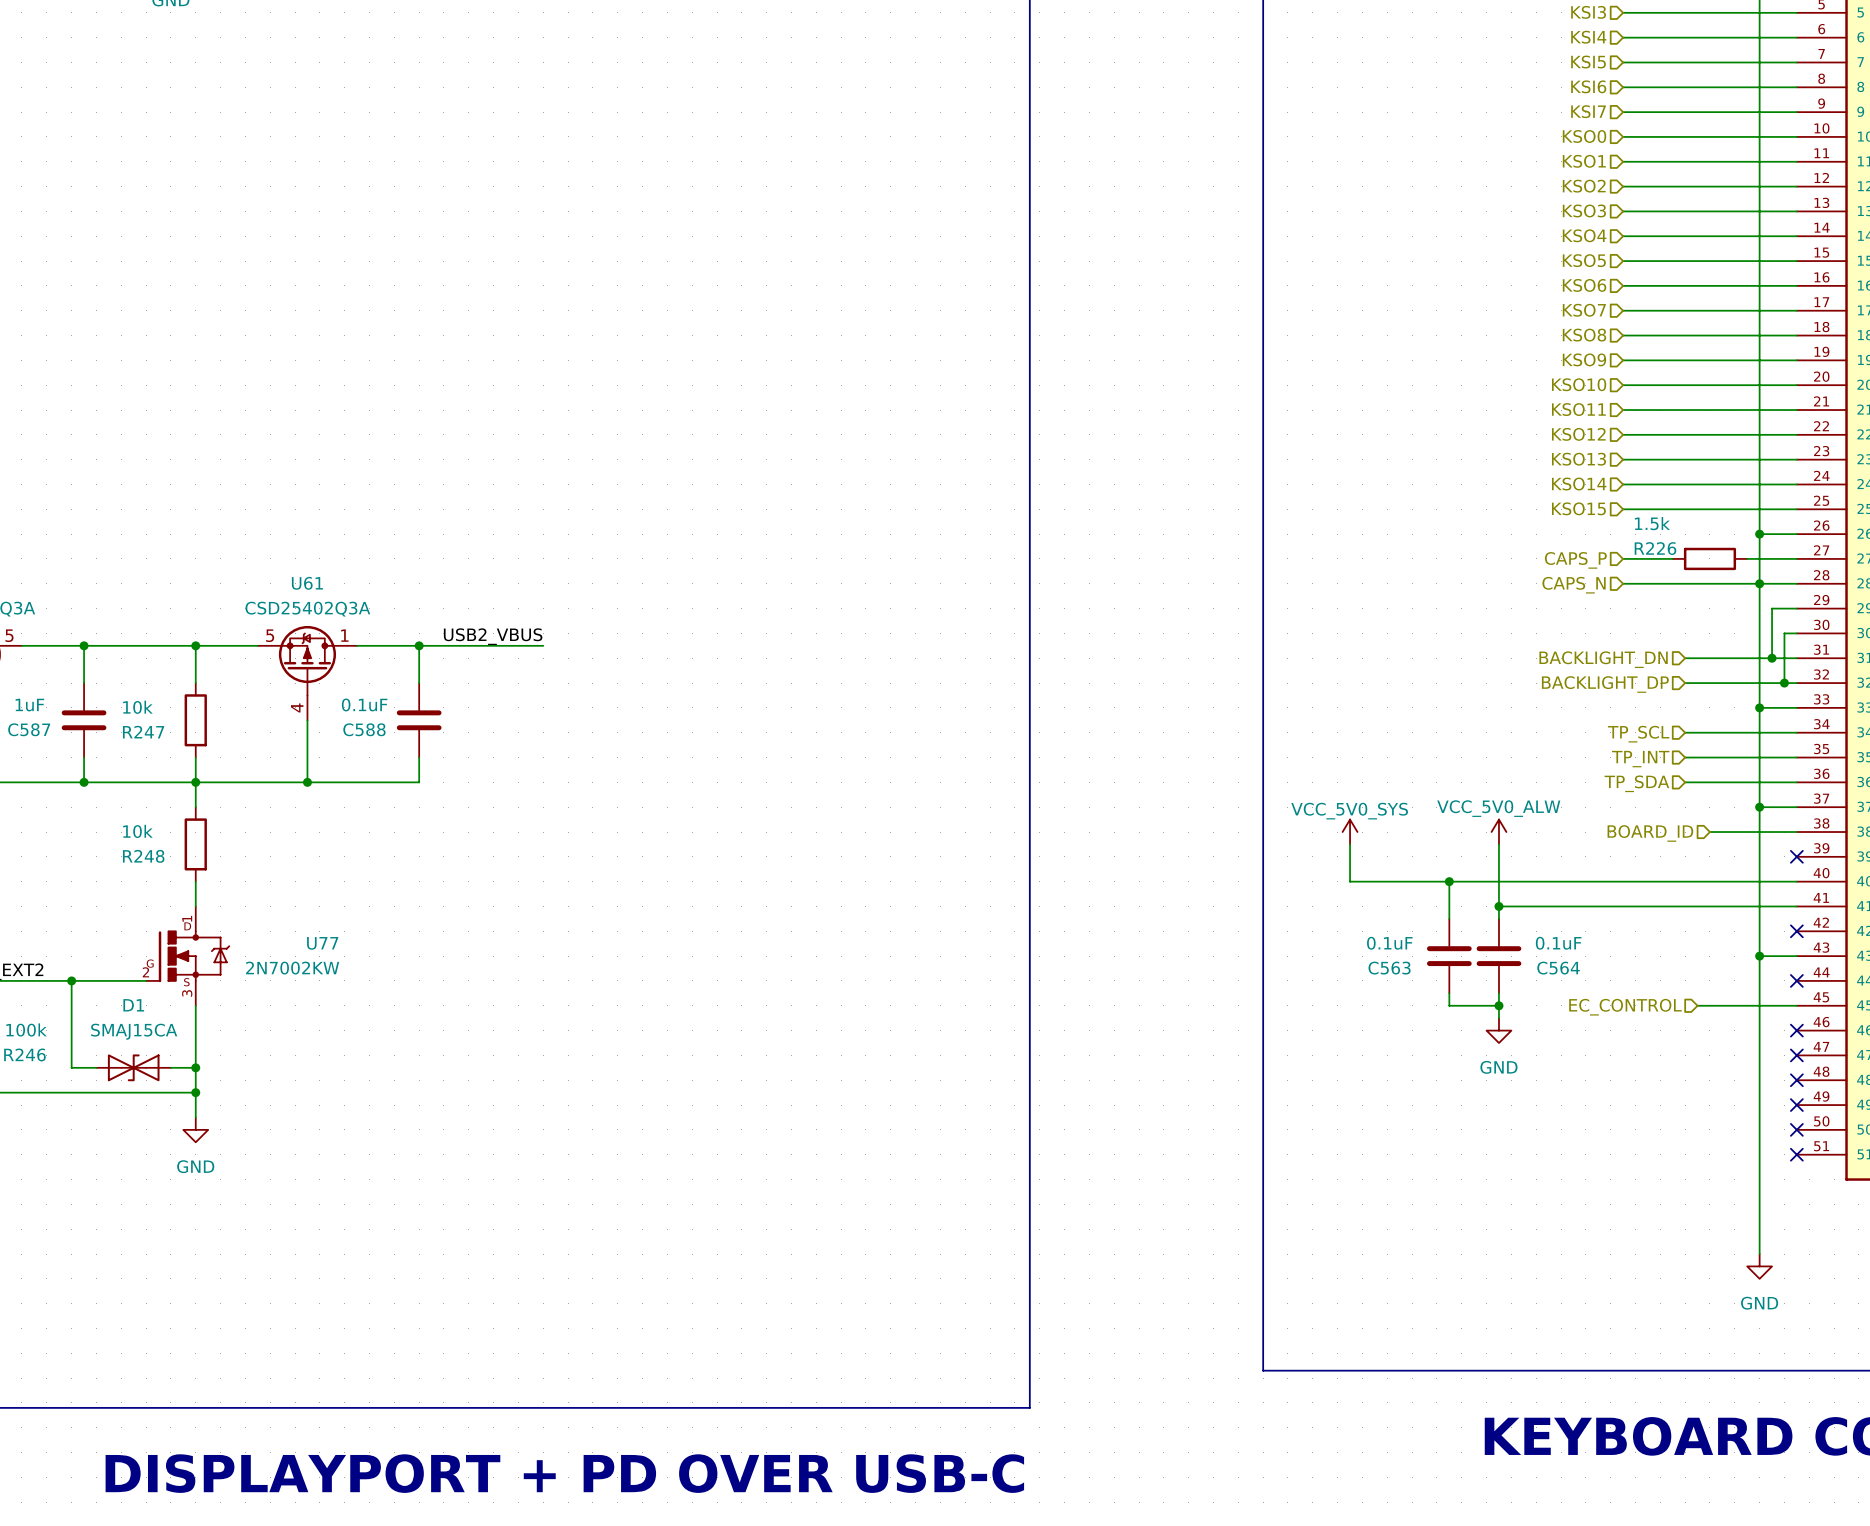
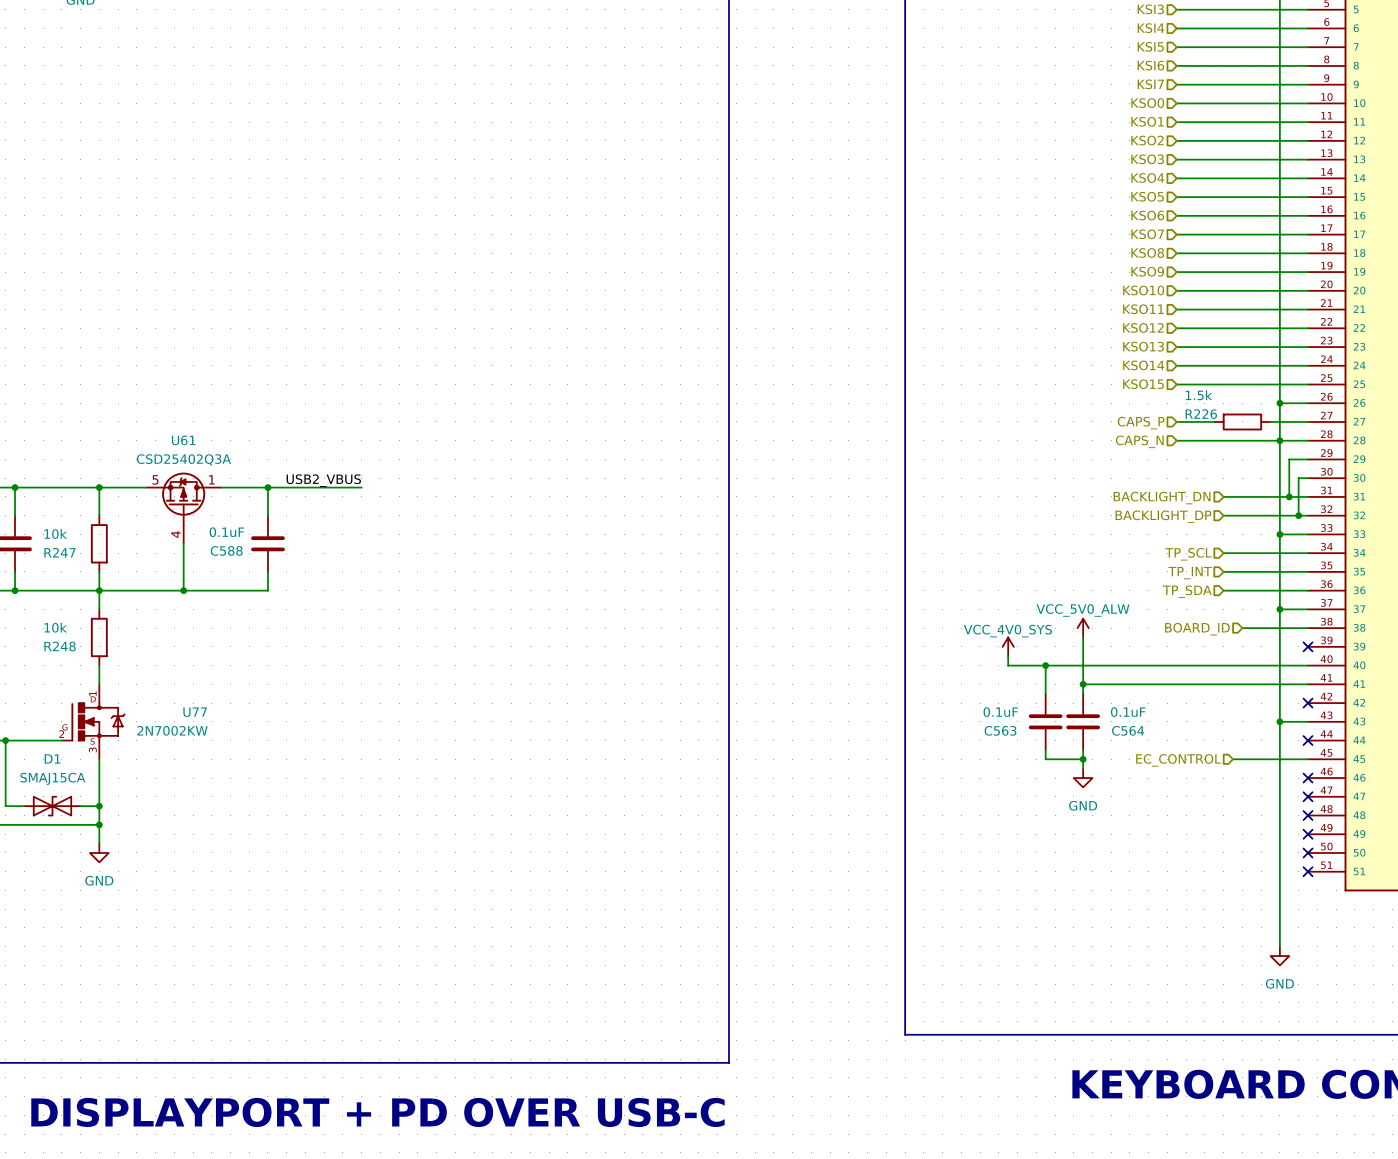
power symbol: VCC_5V0_SYS (1350, 832) -> none
wire: (1350, 844) (1350, 881) (1399, 881) -> (1008, 656) (1008, 665)
power symbol: none -> VCC_4V0_SYS (1008, 646)

